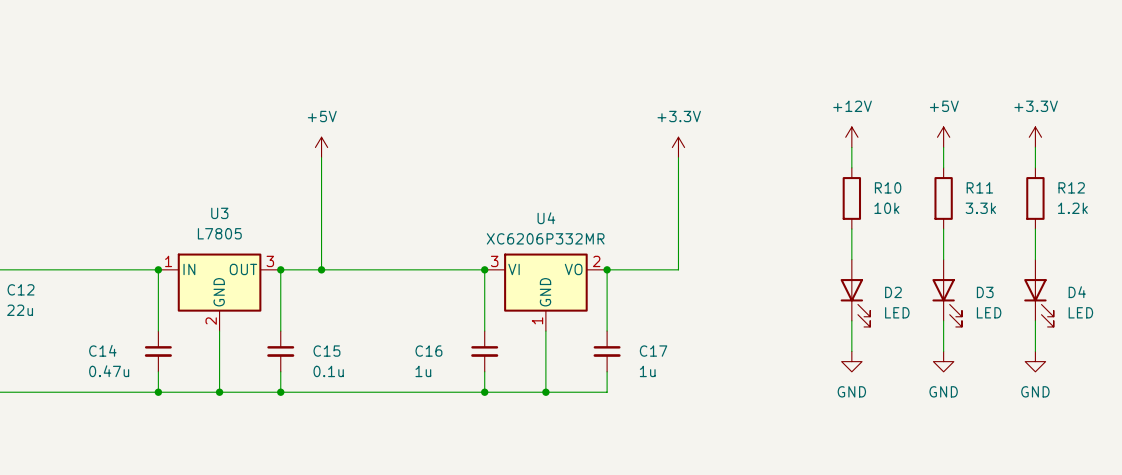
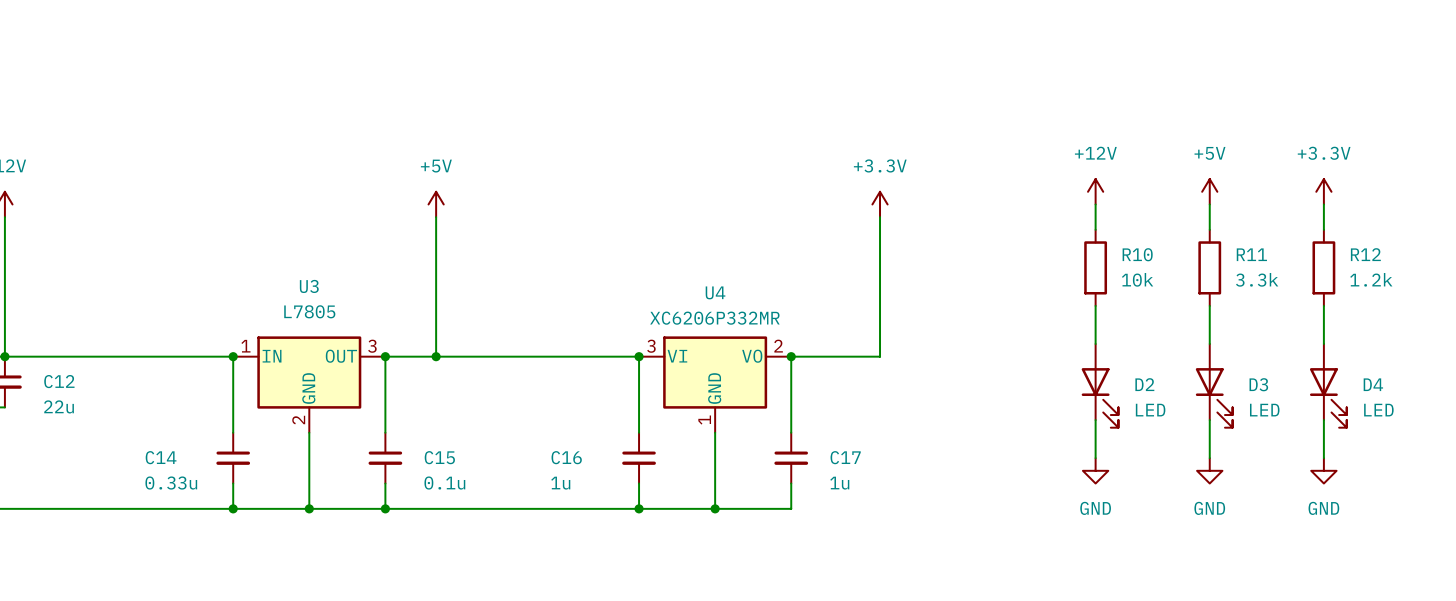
C14 value: 0.47u (109, 371) -> 0.33u (171, 483)

